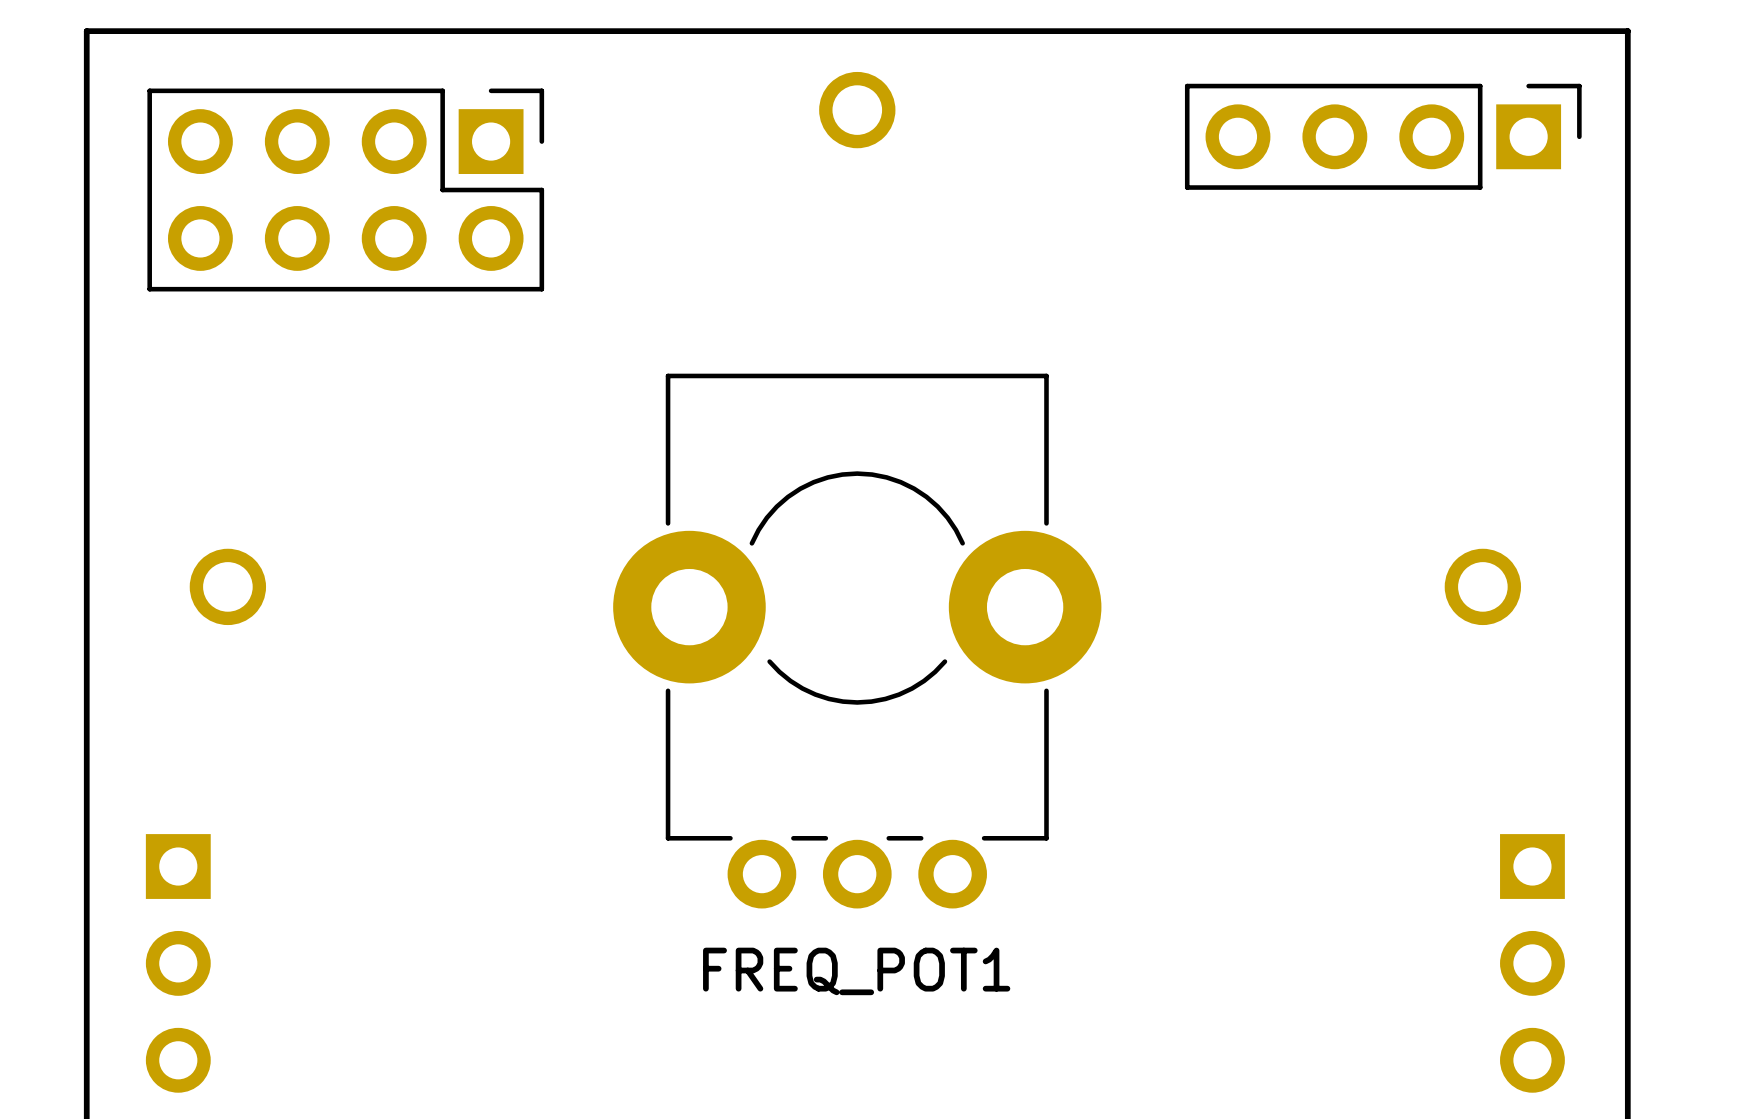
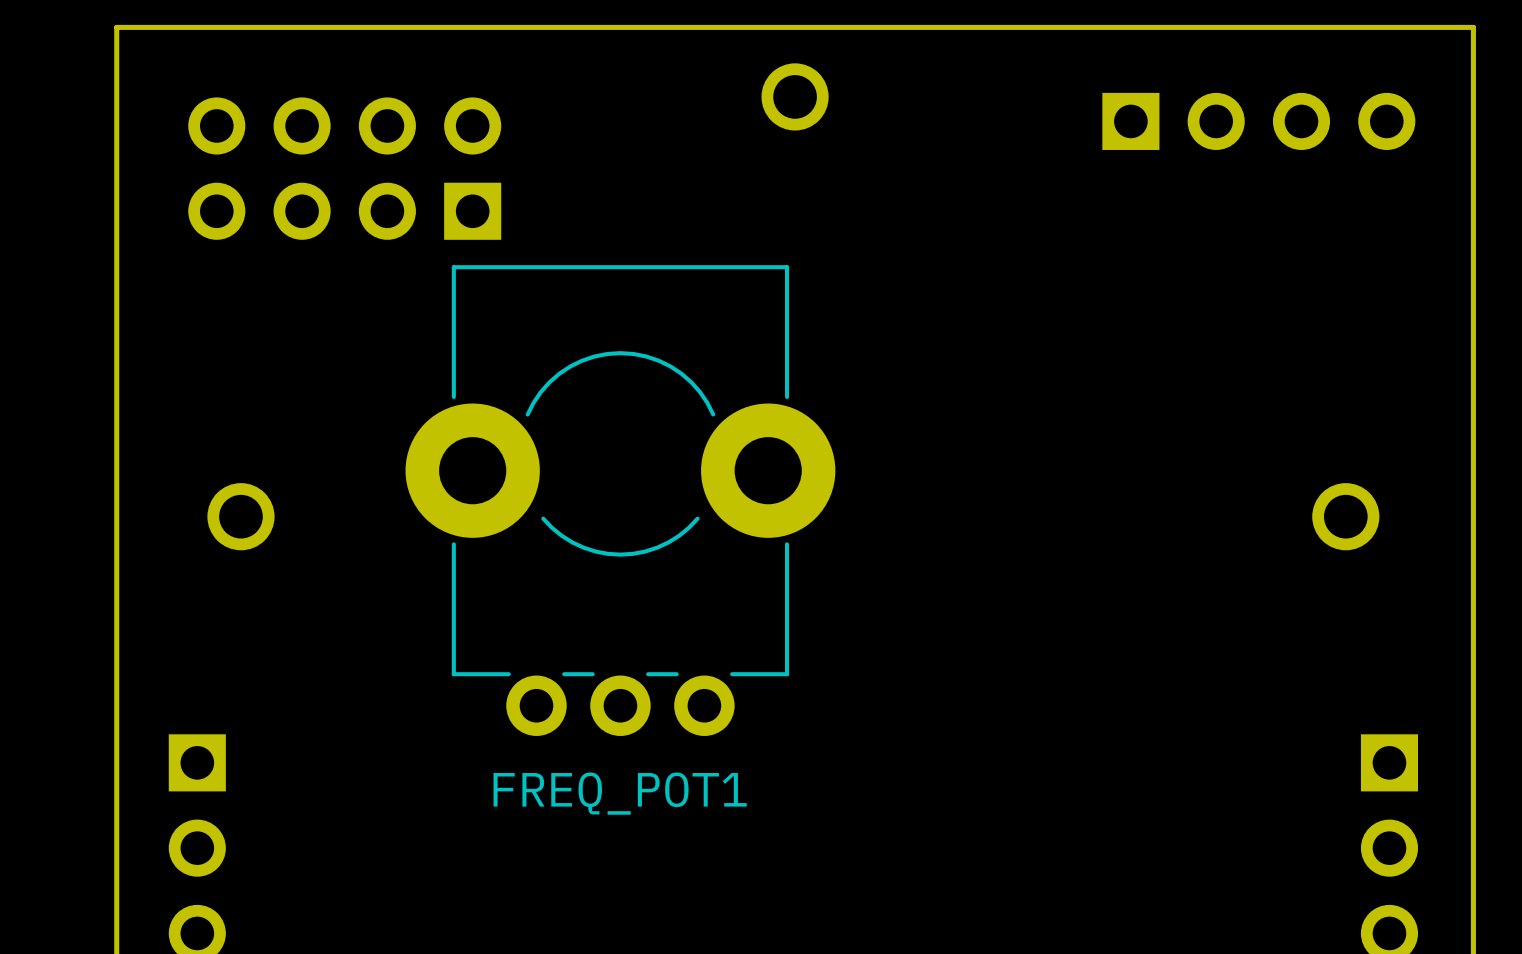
part side: top (1383, 136) -> bottom (1258, 121)
part side: top (345, 190) -> bottom (344, 168)
FREQ_POT1 position: (857, 641) -> (620, 500)

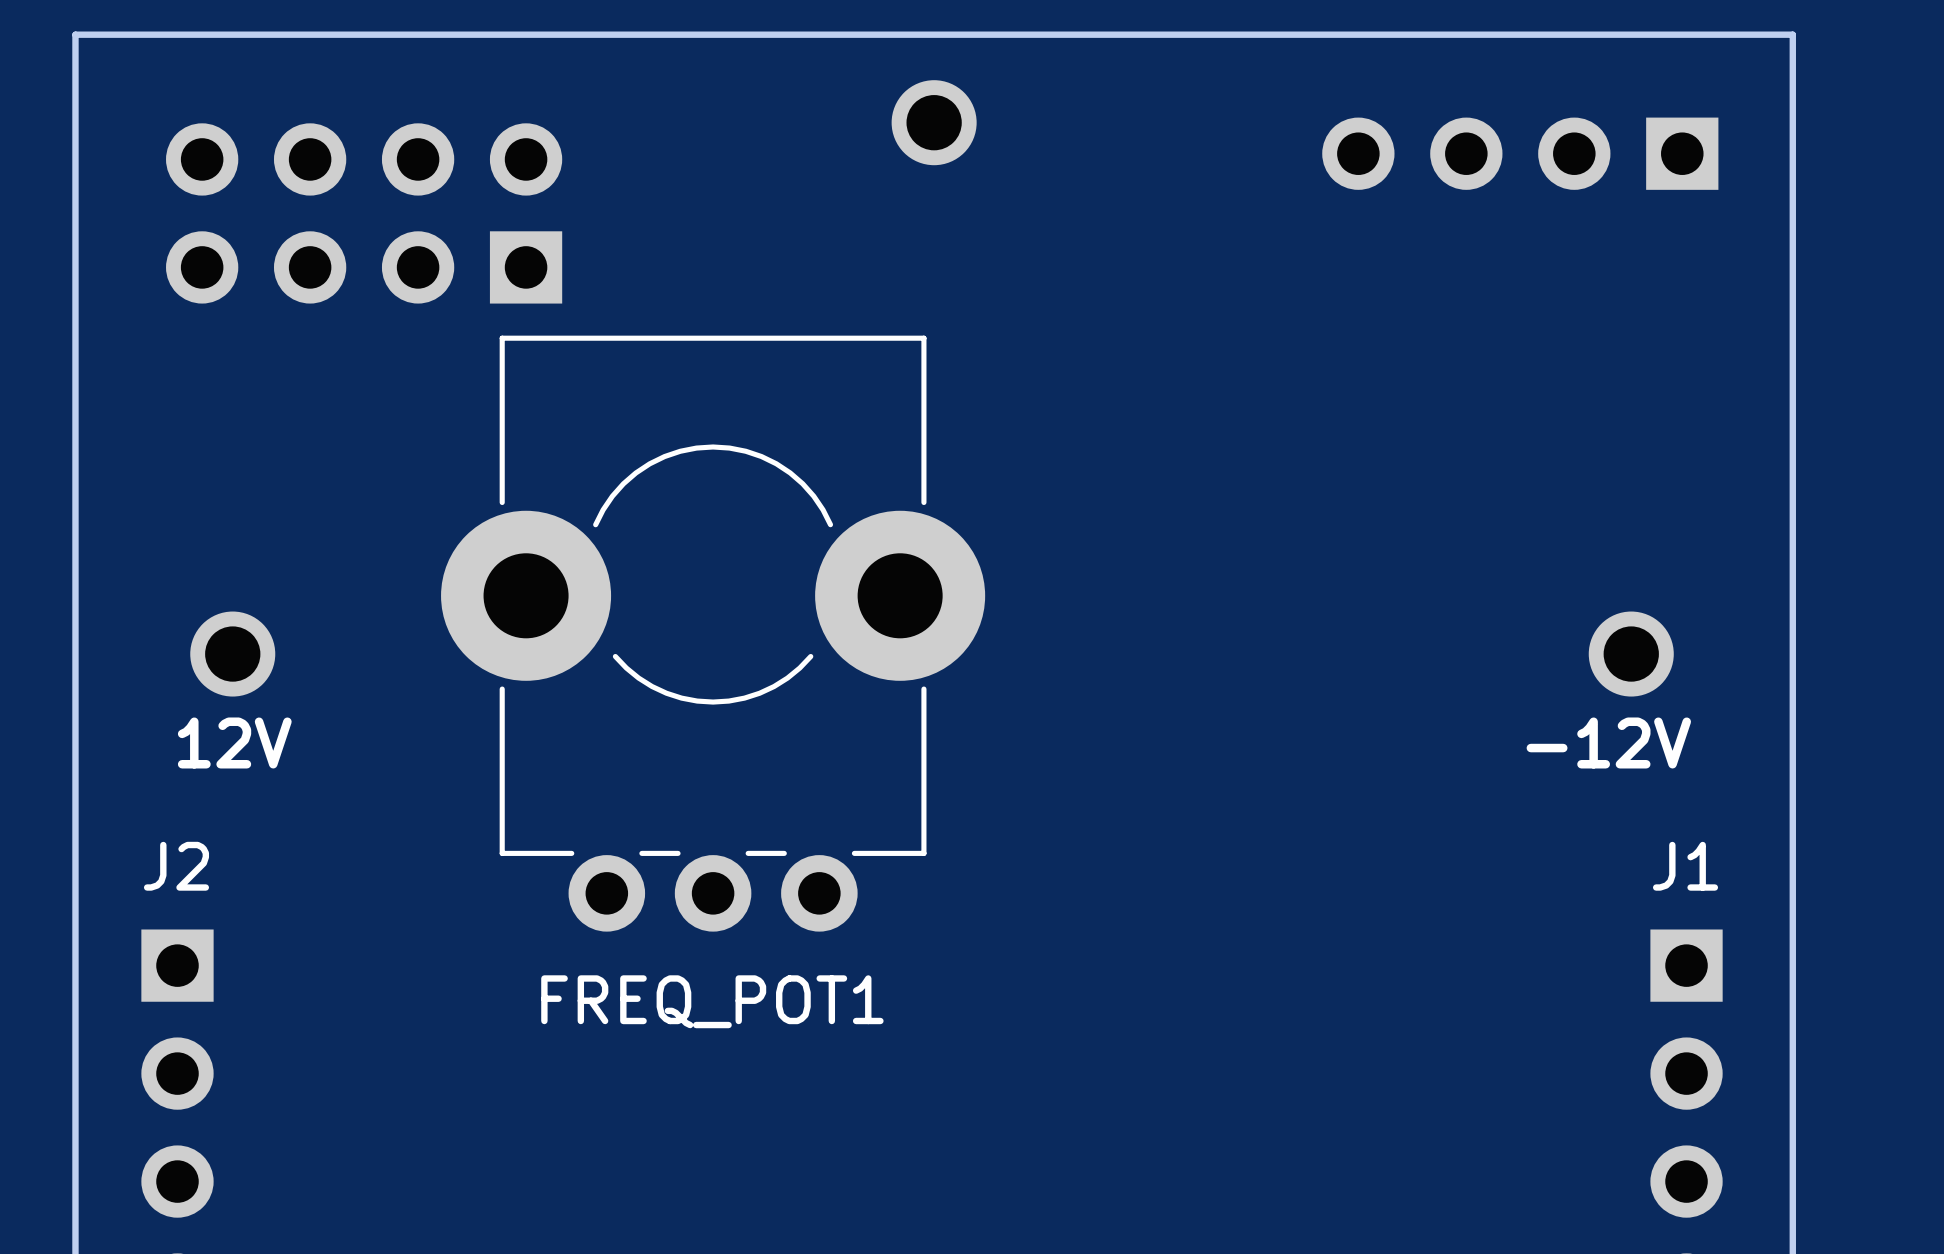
part rotation: 0° (1258, 121) -> 180° (1520, 153)
text: none -> 12V (234, 742)
text: none -> -12V (1608, 742)
text: none -> J2 (176, 866)
text: none -> J1 (1685, 866)

